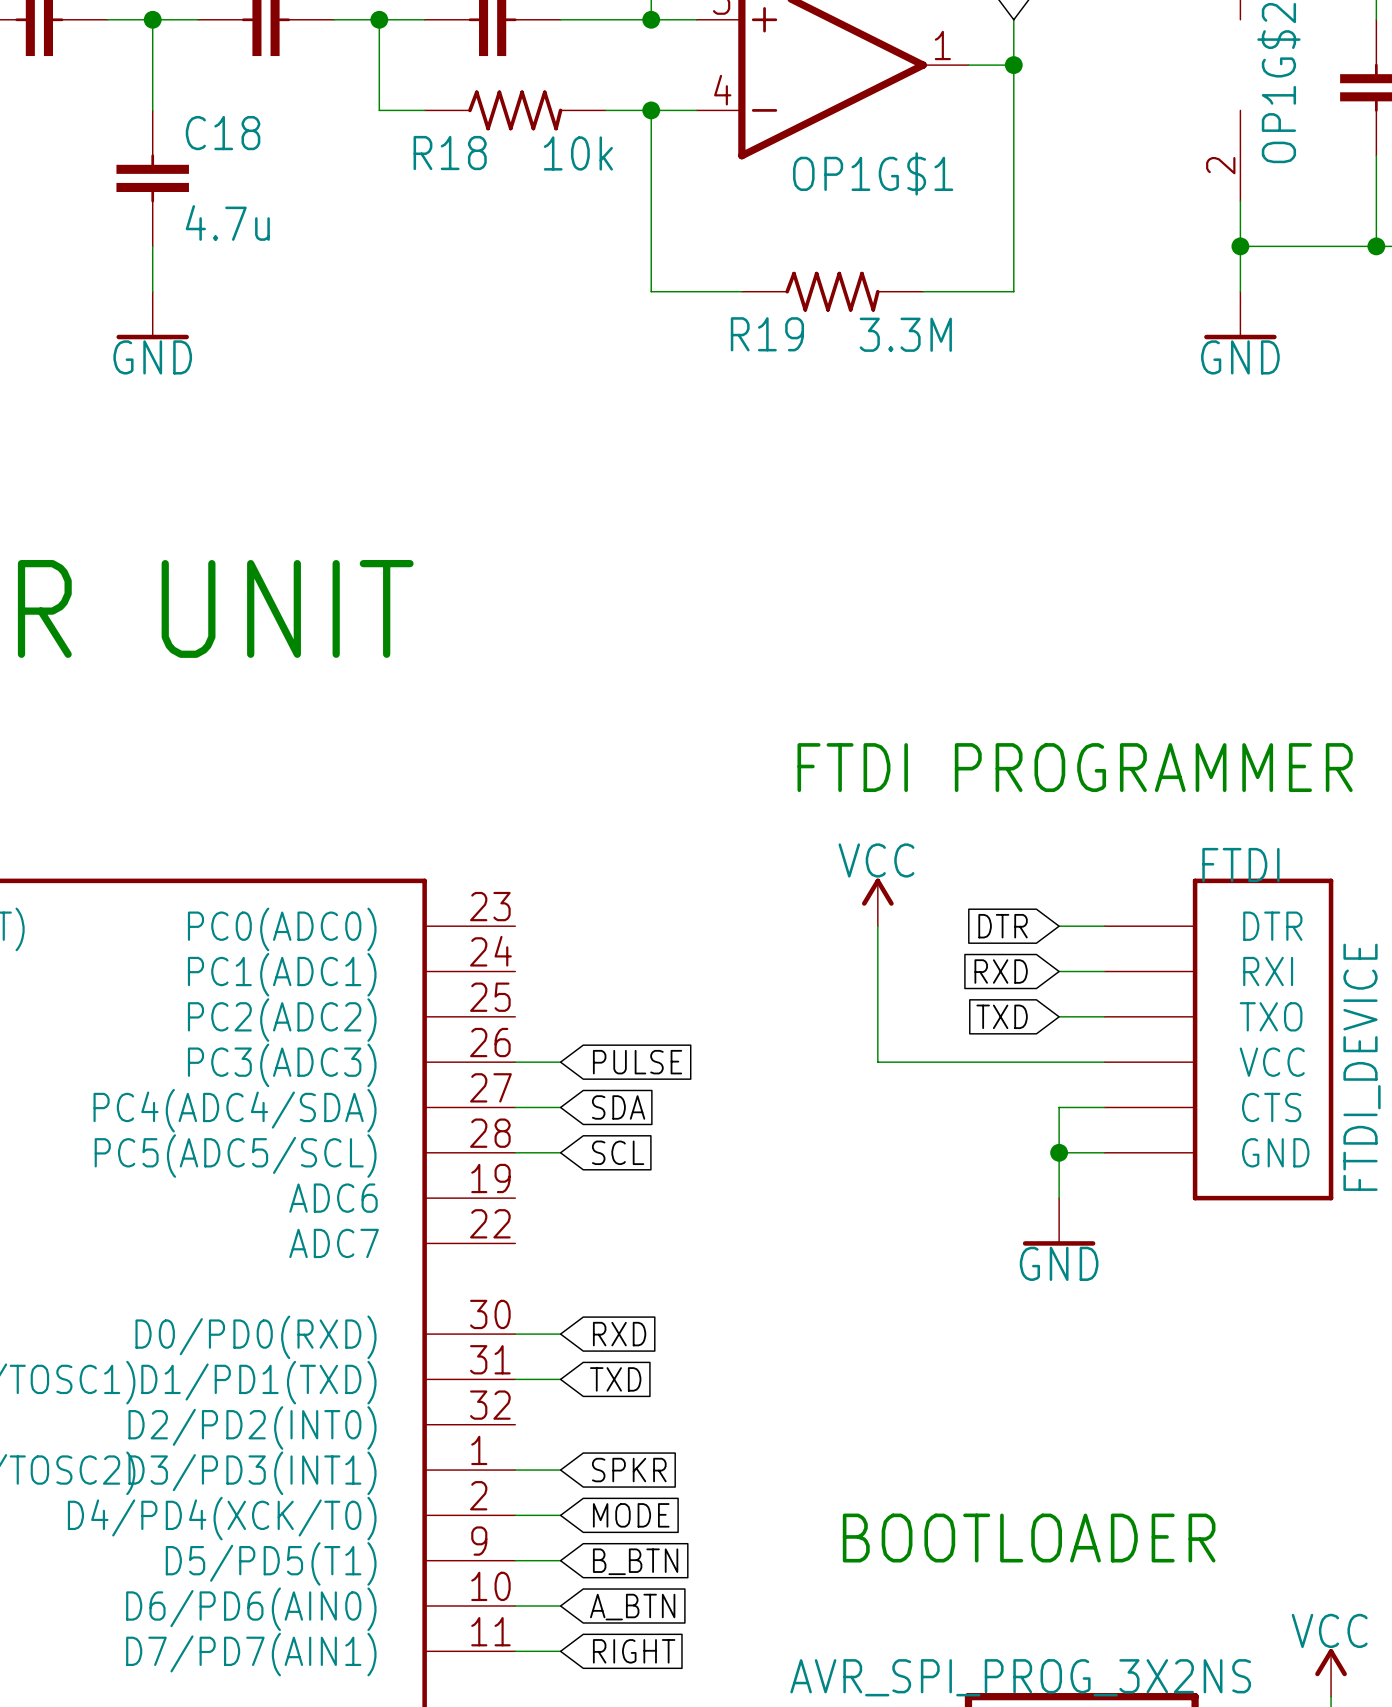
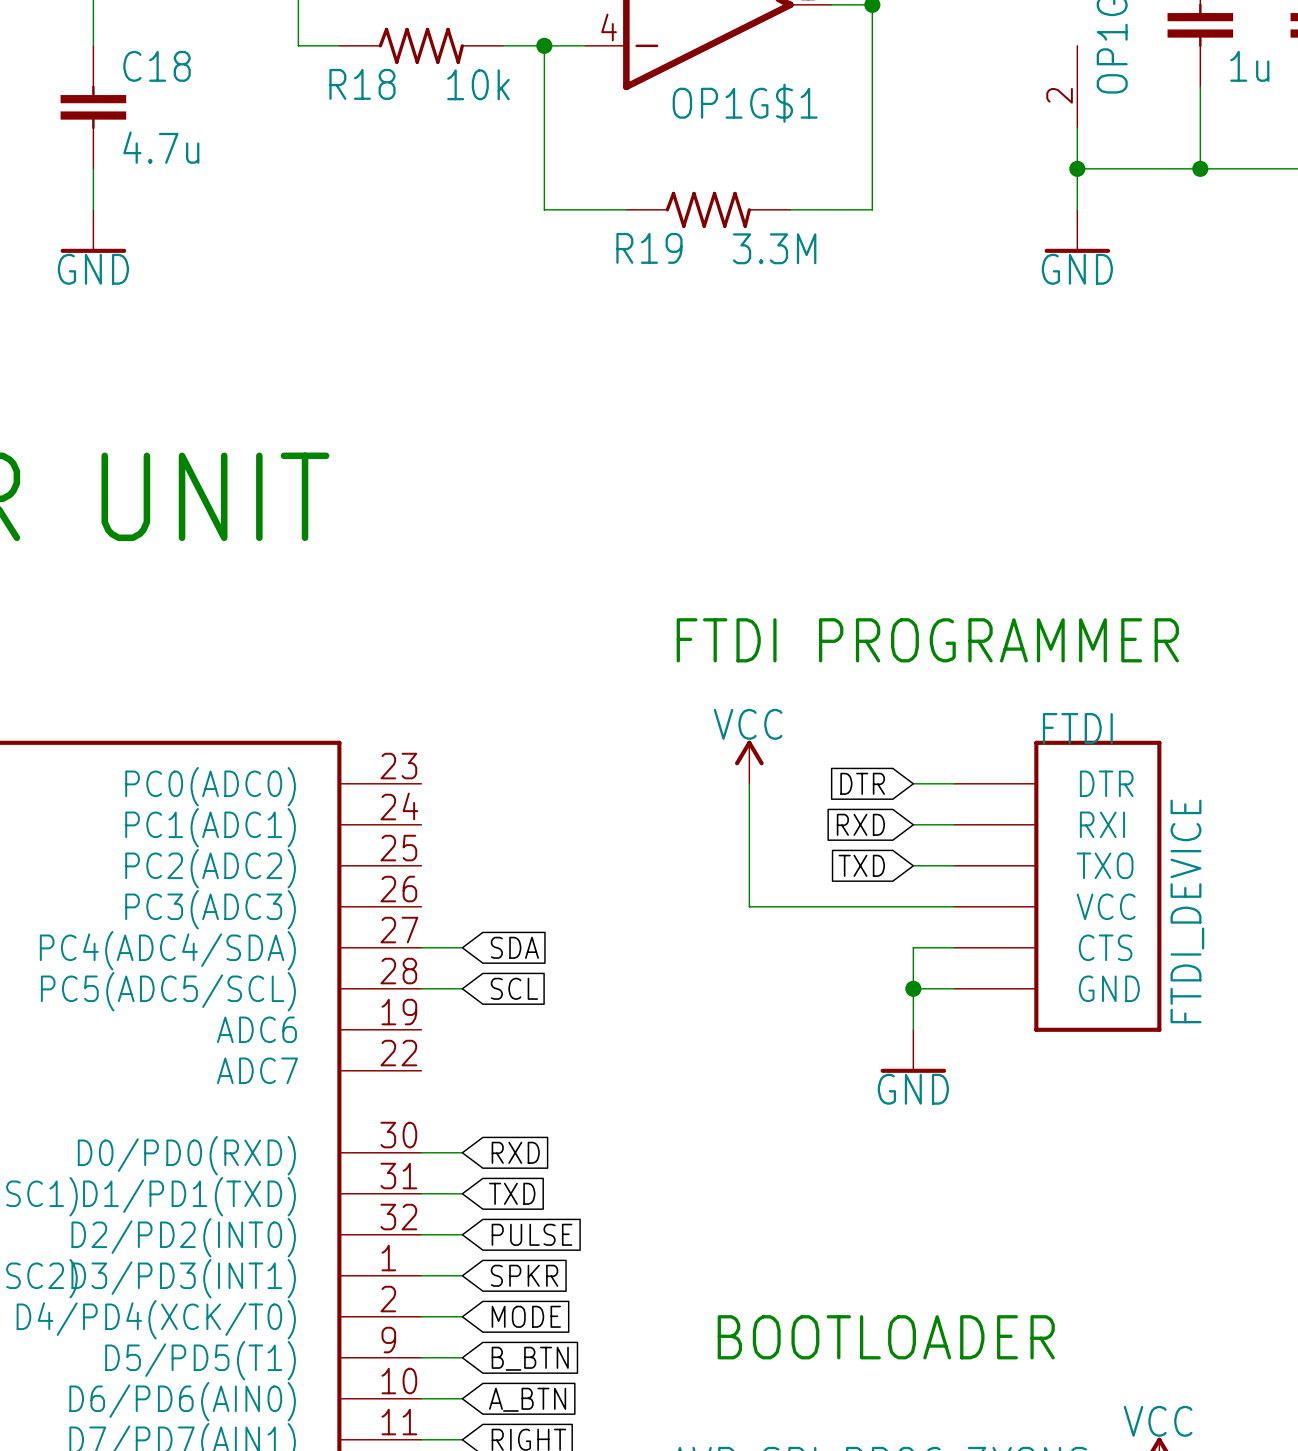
wire: (515, 1062) (560, 1062) -> (421, 1234) (462, 1234)
global label position: PULSE (637, 1062) -> PULSE (531, 1234)

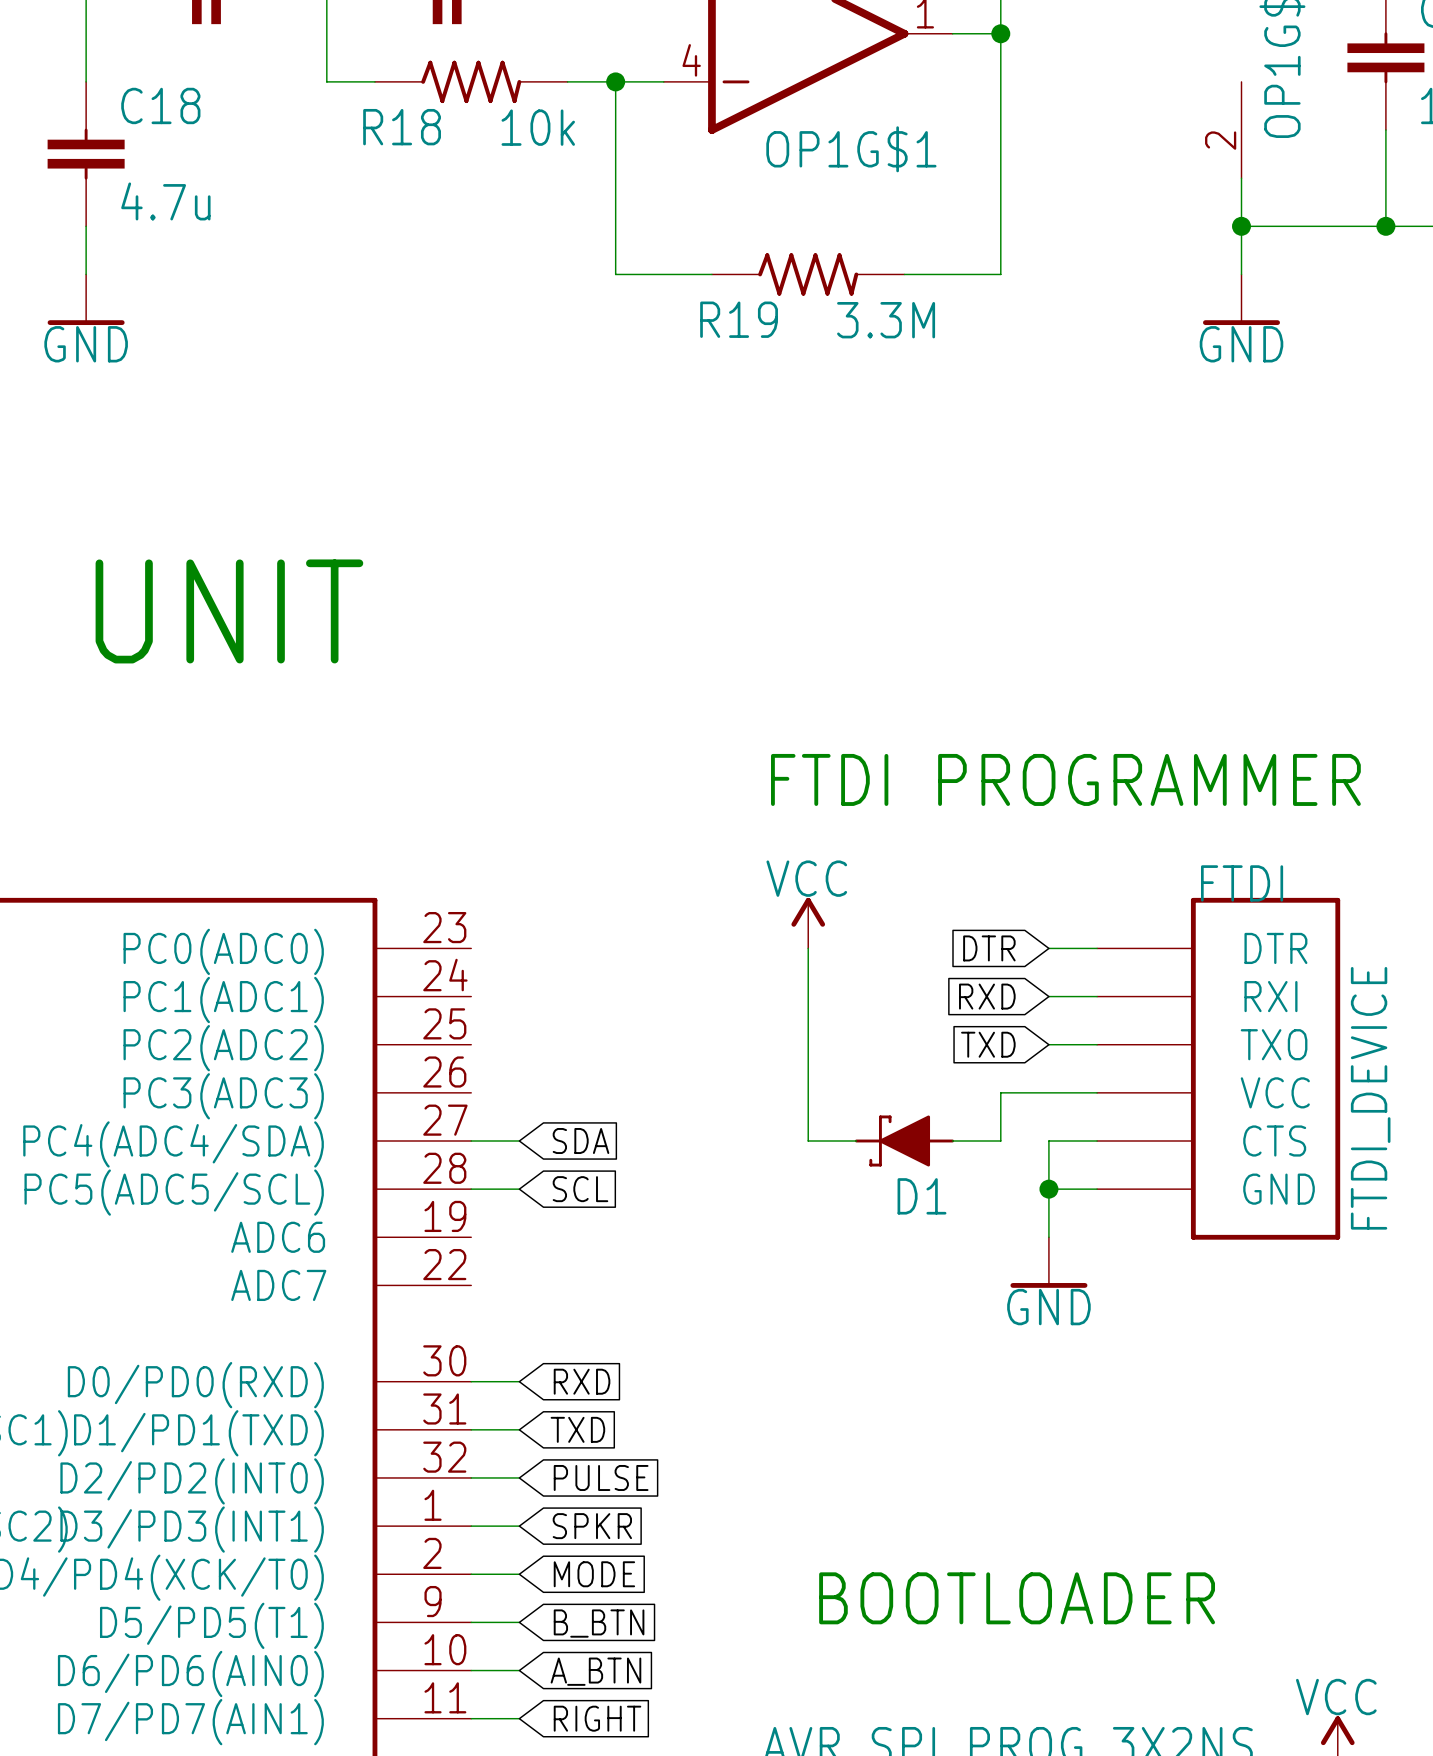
power symbol position: VCC (749, 762) -> VCC (808, 923)
wire: none -> (808, 948) (808, 1141) (856, 1141)
wire: (749, 783) (749, 906) (872, 906) -> (952, 1141) (1000, 1141) (1000, 1092)
D1: none -> (904, 1141)

